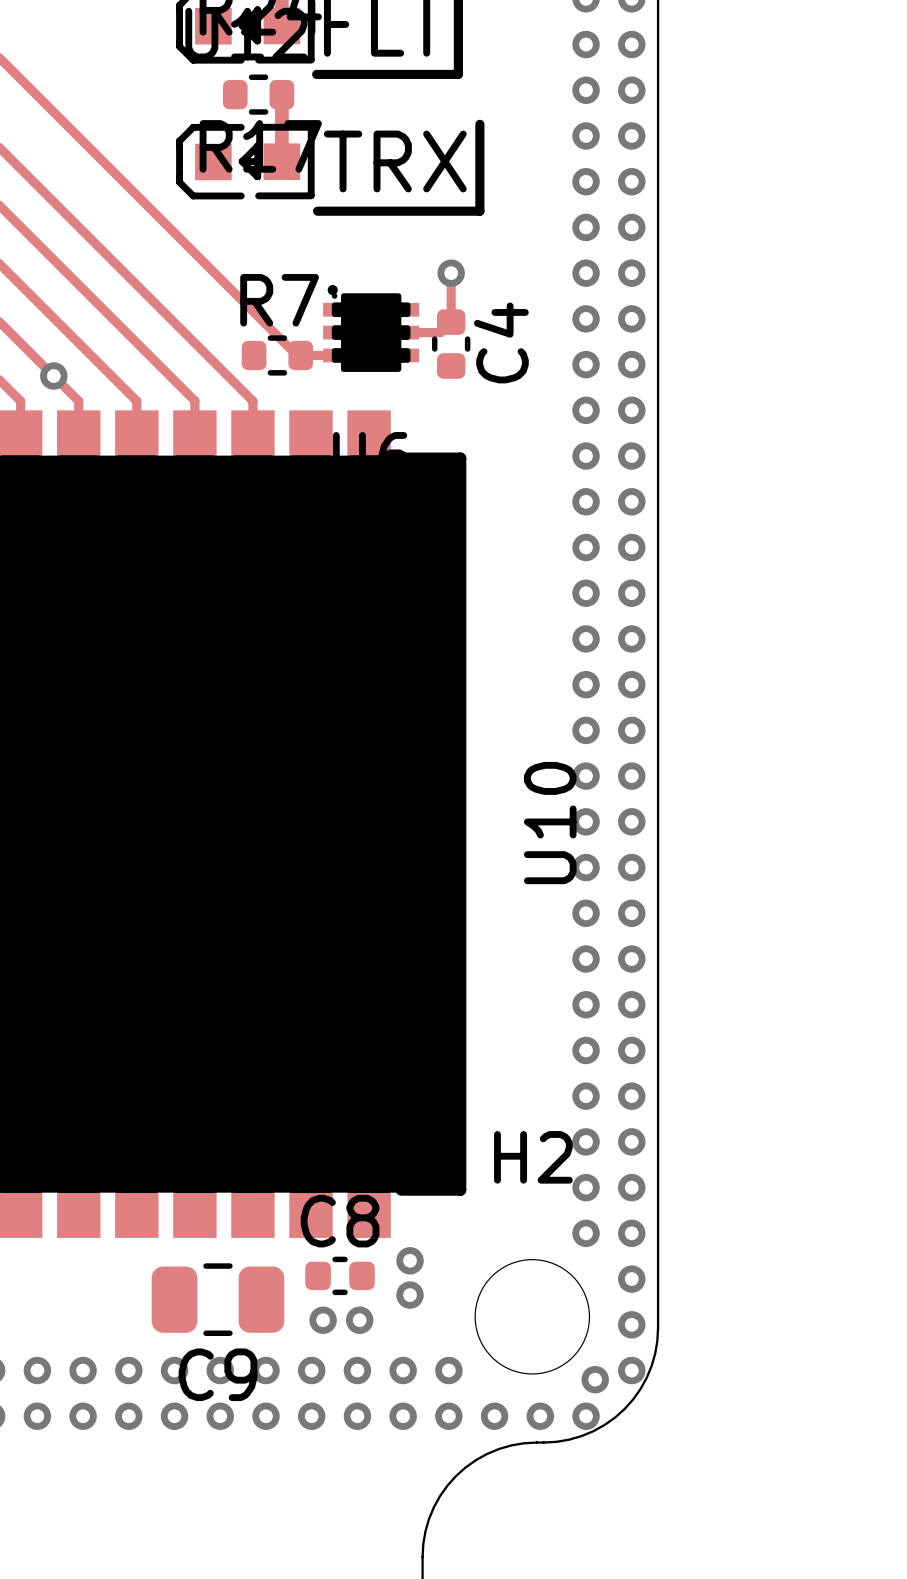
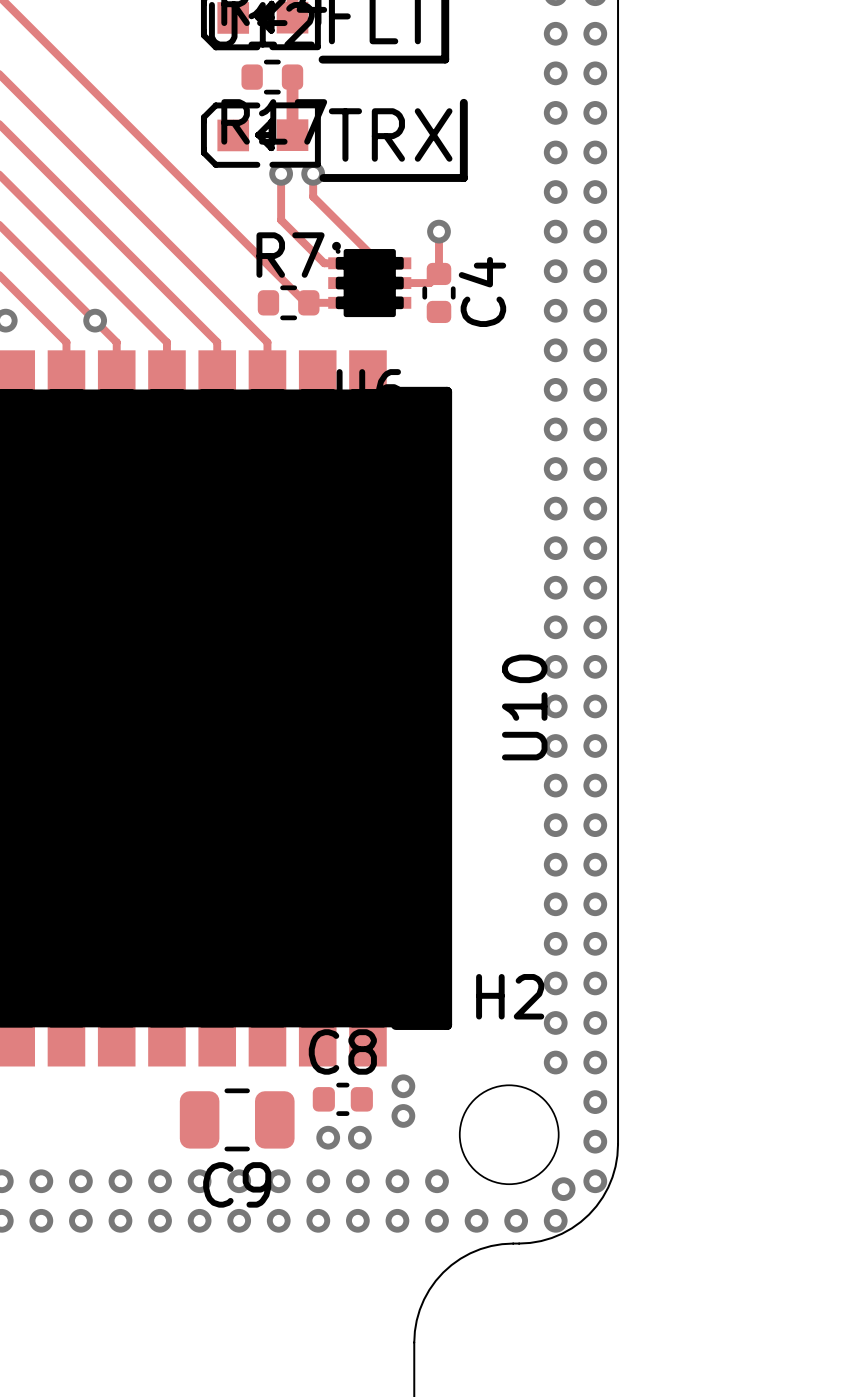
track: none -> (281, 174) (281, 220) (324, 263) (340, 263)
via: none -> (281, 173)
track: none -> (313, 173) (313, 196) (379, 263) (399, 263)
via: none -> (313, 173)

